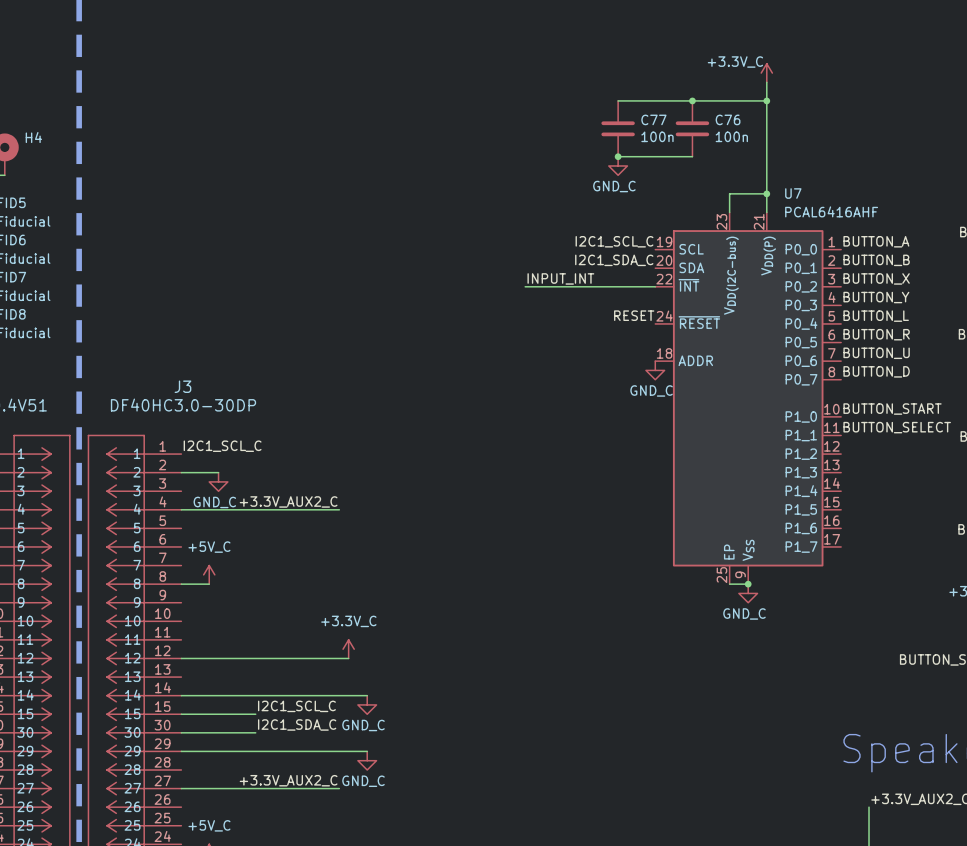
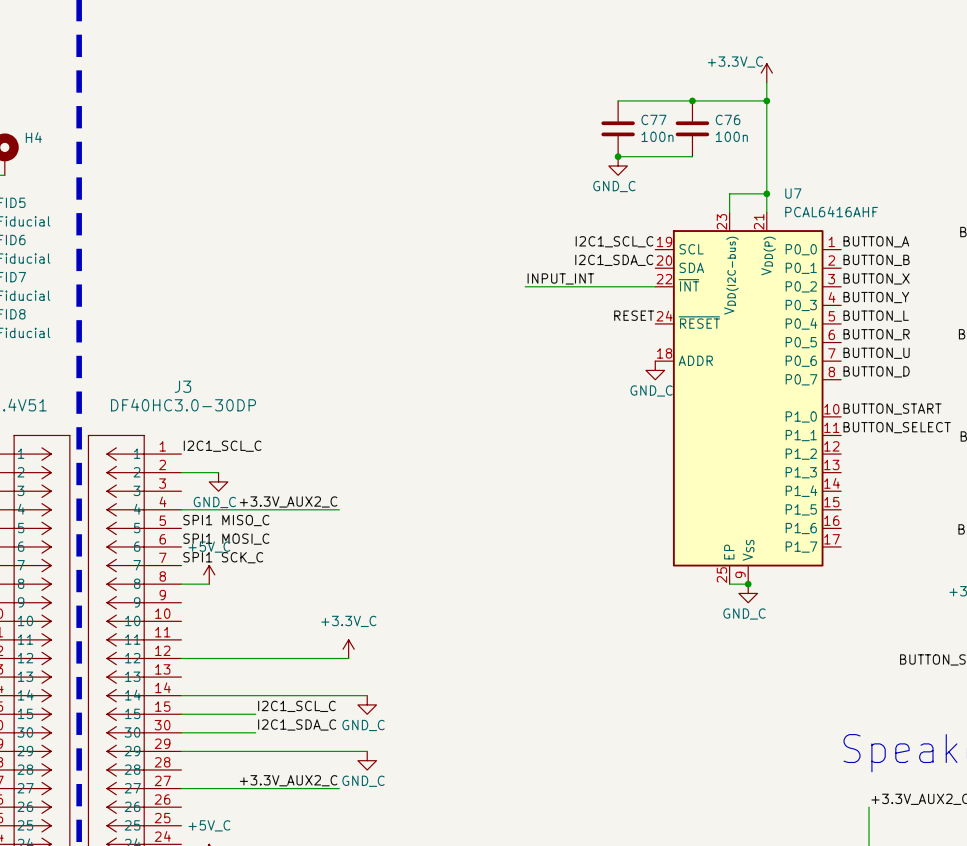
label: none -> SPI1 MISO_C (226, 520)
label: none -> SPI1 MOSI_C (226, 539)
label: none -> SPI1 SCK_C (223, 557)

